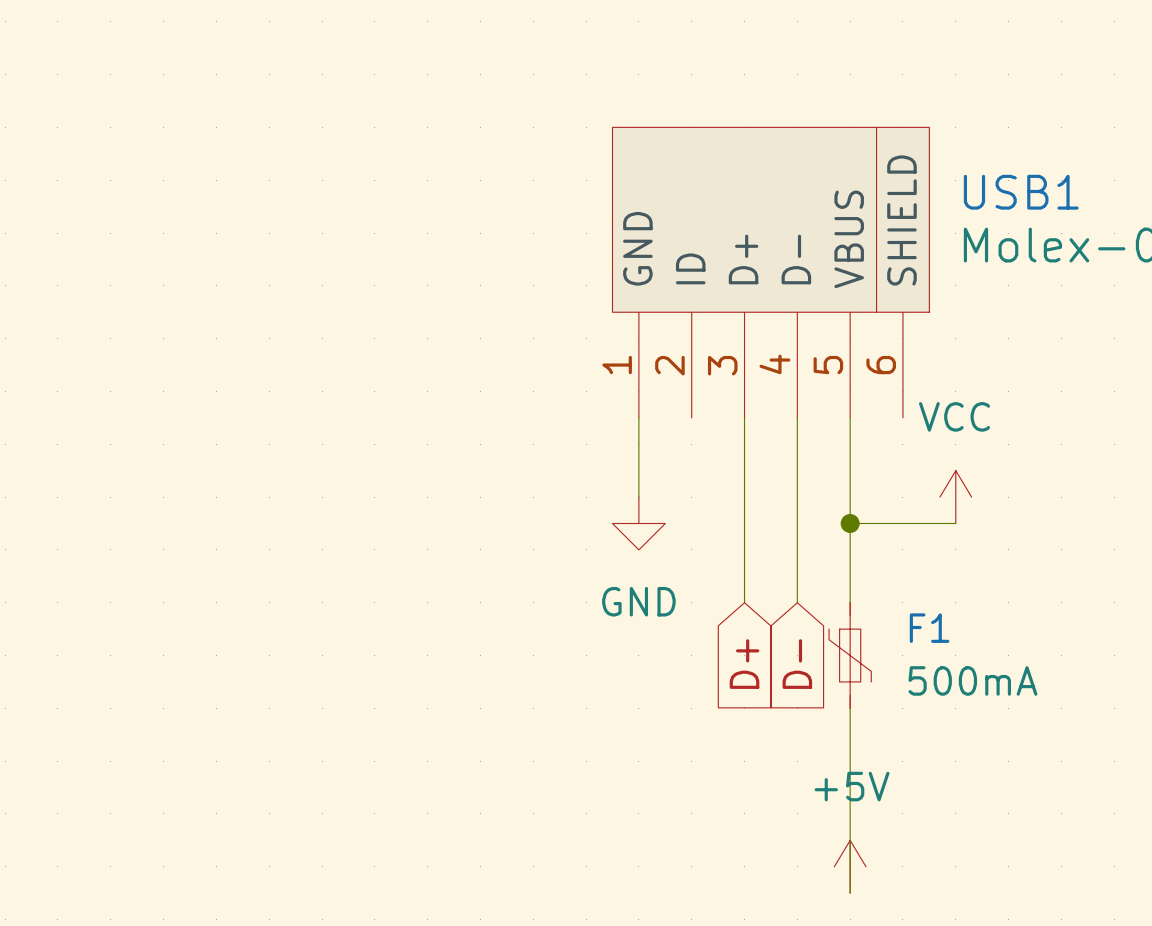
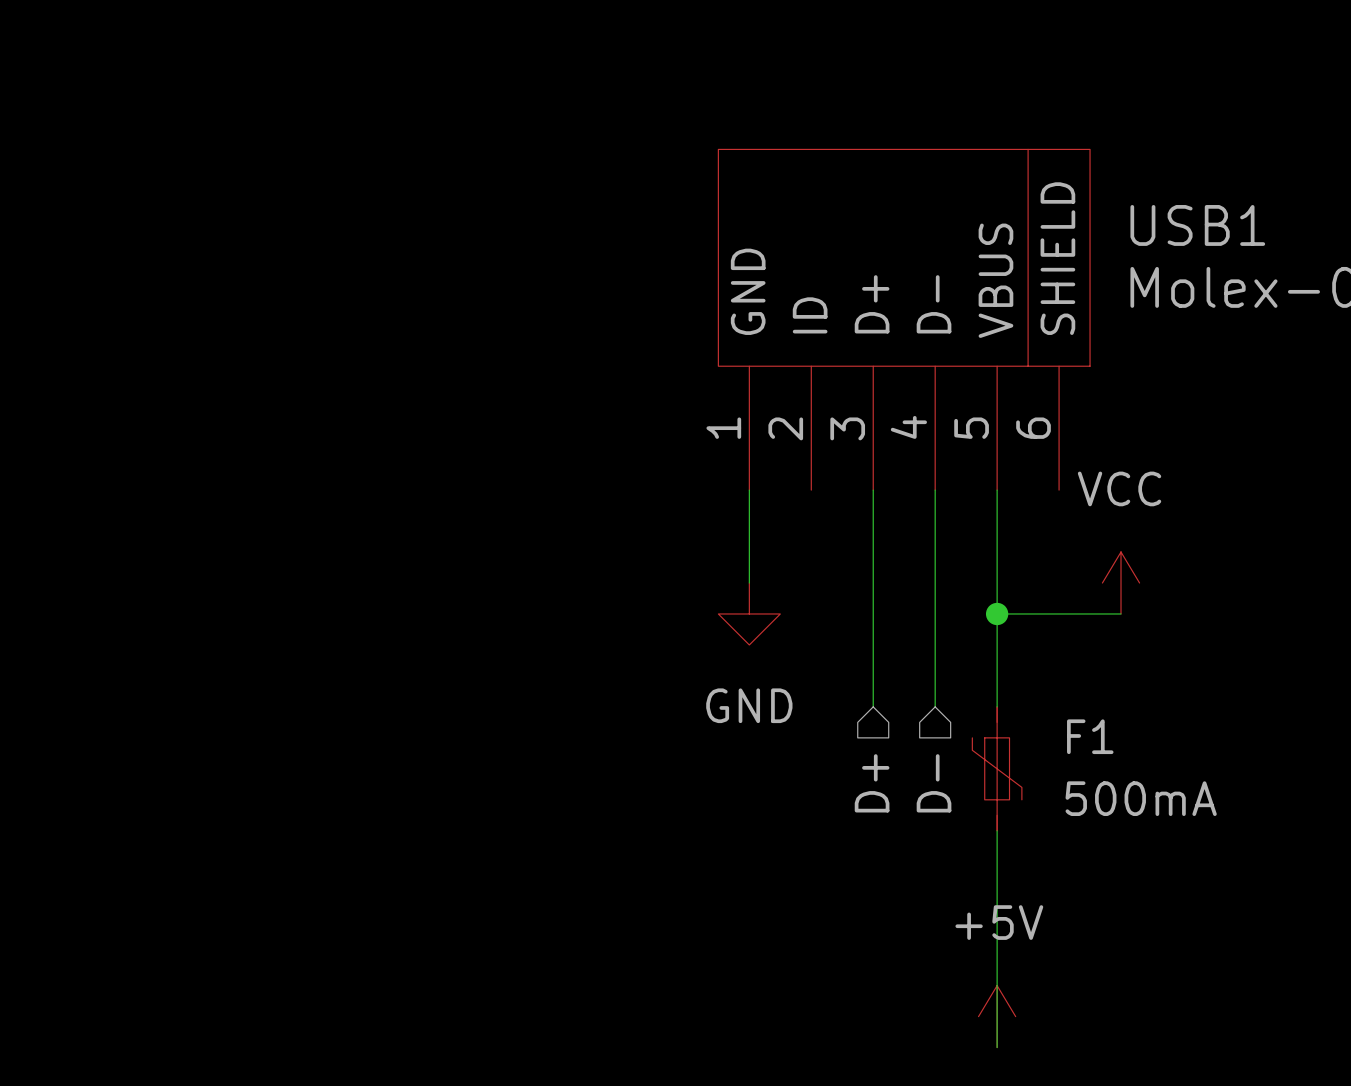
global label: D+ (744, 664) -> none
global label: D- (797, 664) -> none
hierarchical label: none -> D+ (872, 783)
hierarchical label: none -> D- (934, 783)

